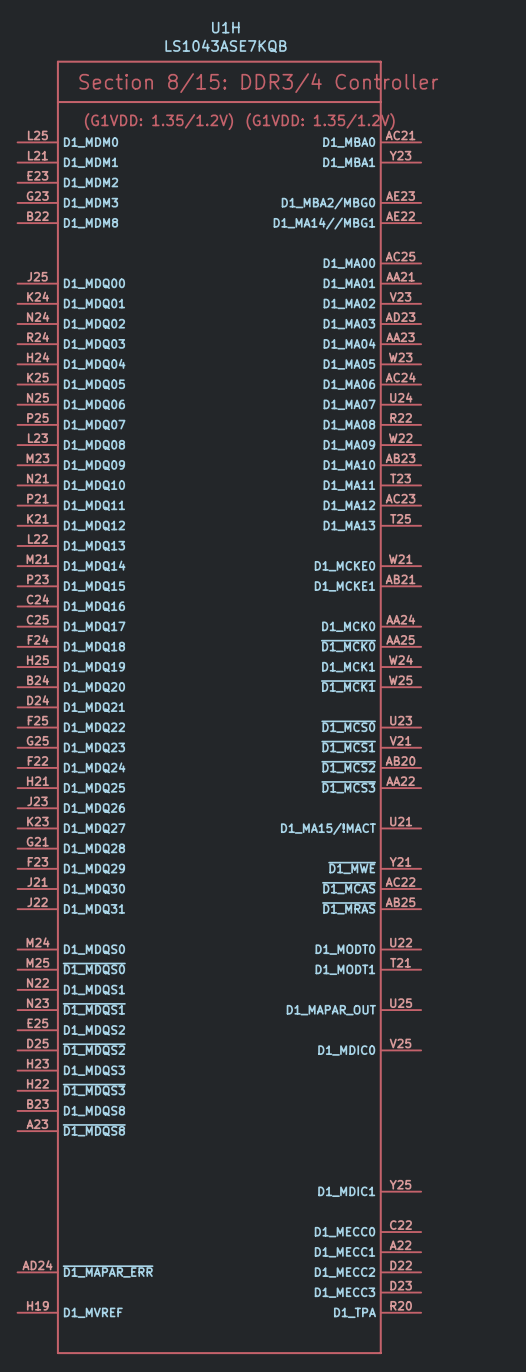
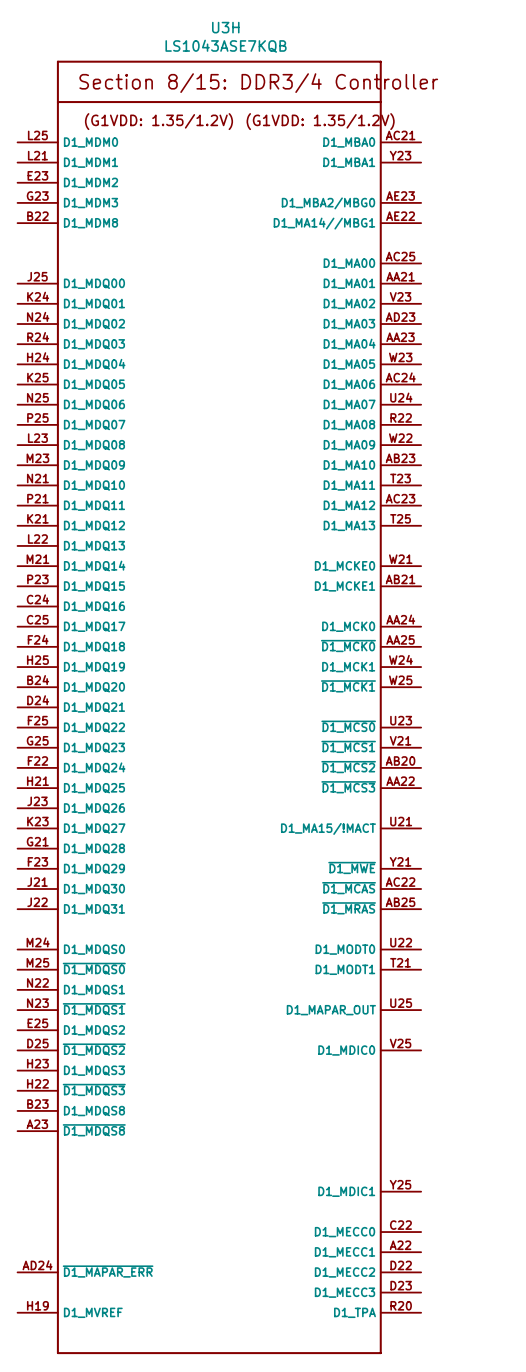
U1H name: U1H (225, 27) -> U3H (225, 27)

